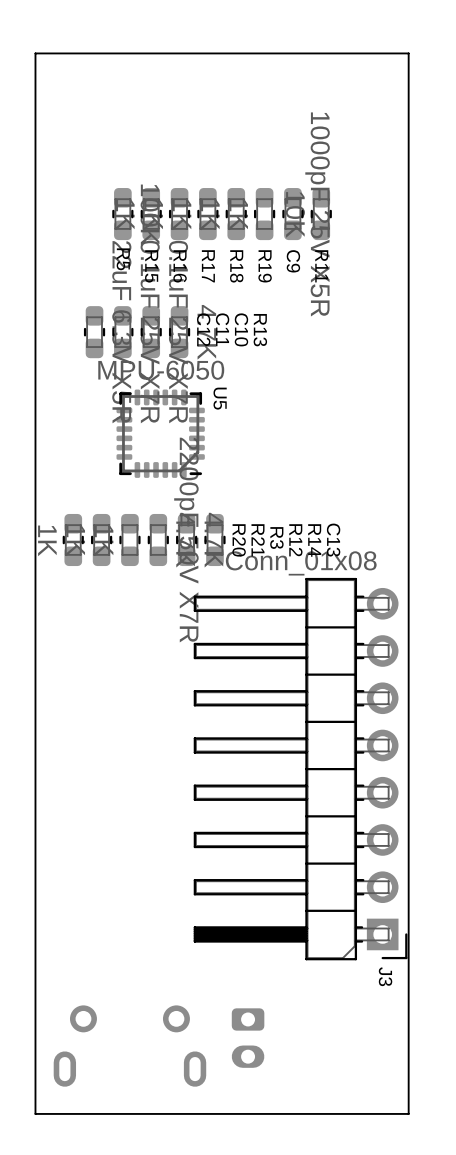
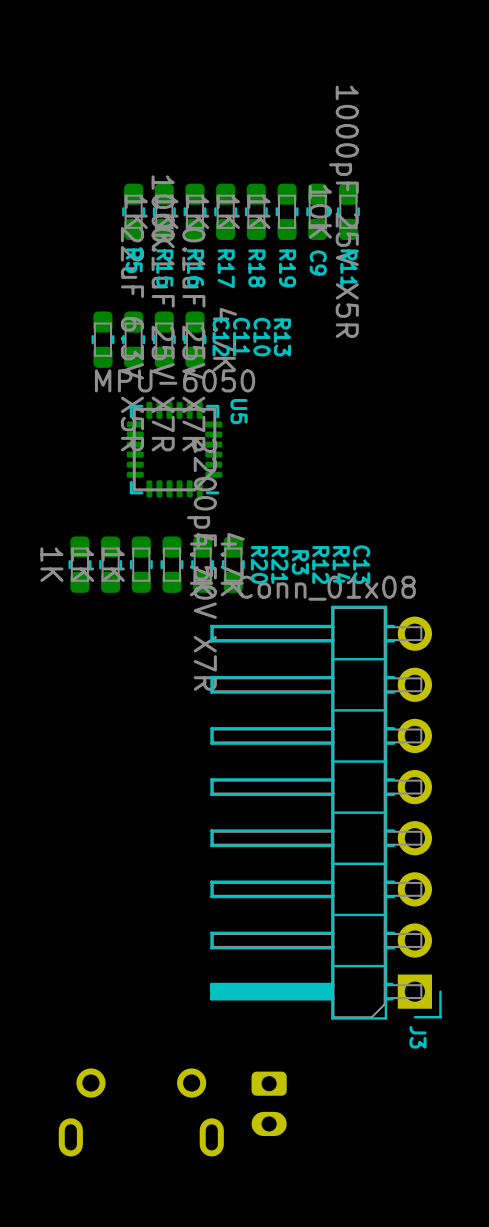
board edge: (408, 53) (35, 53) (35, 1113) (408, 1113) (408, 53) -> none

